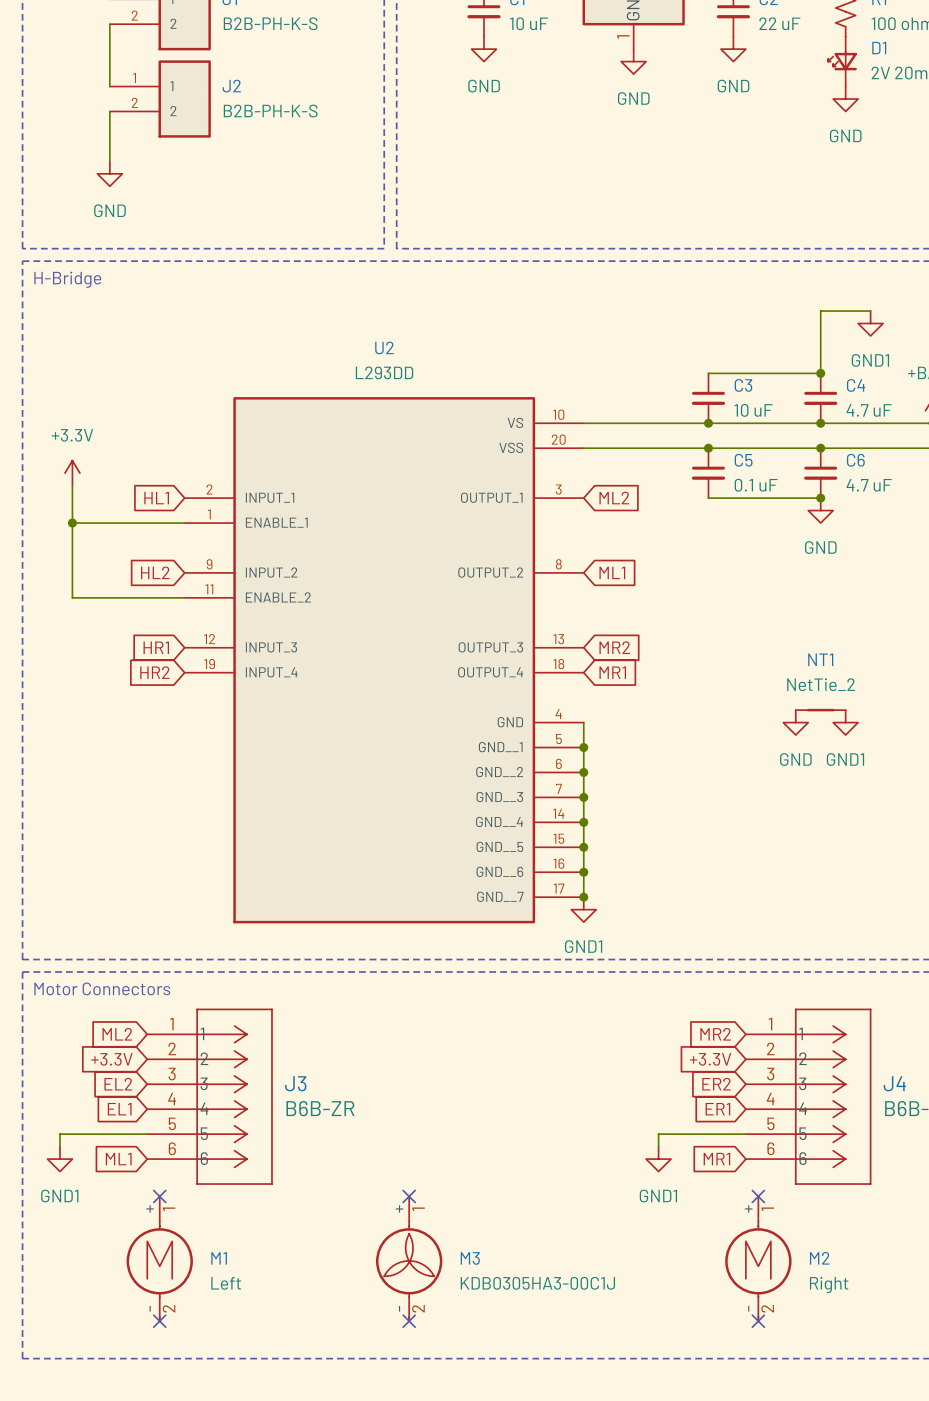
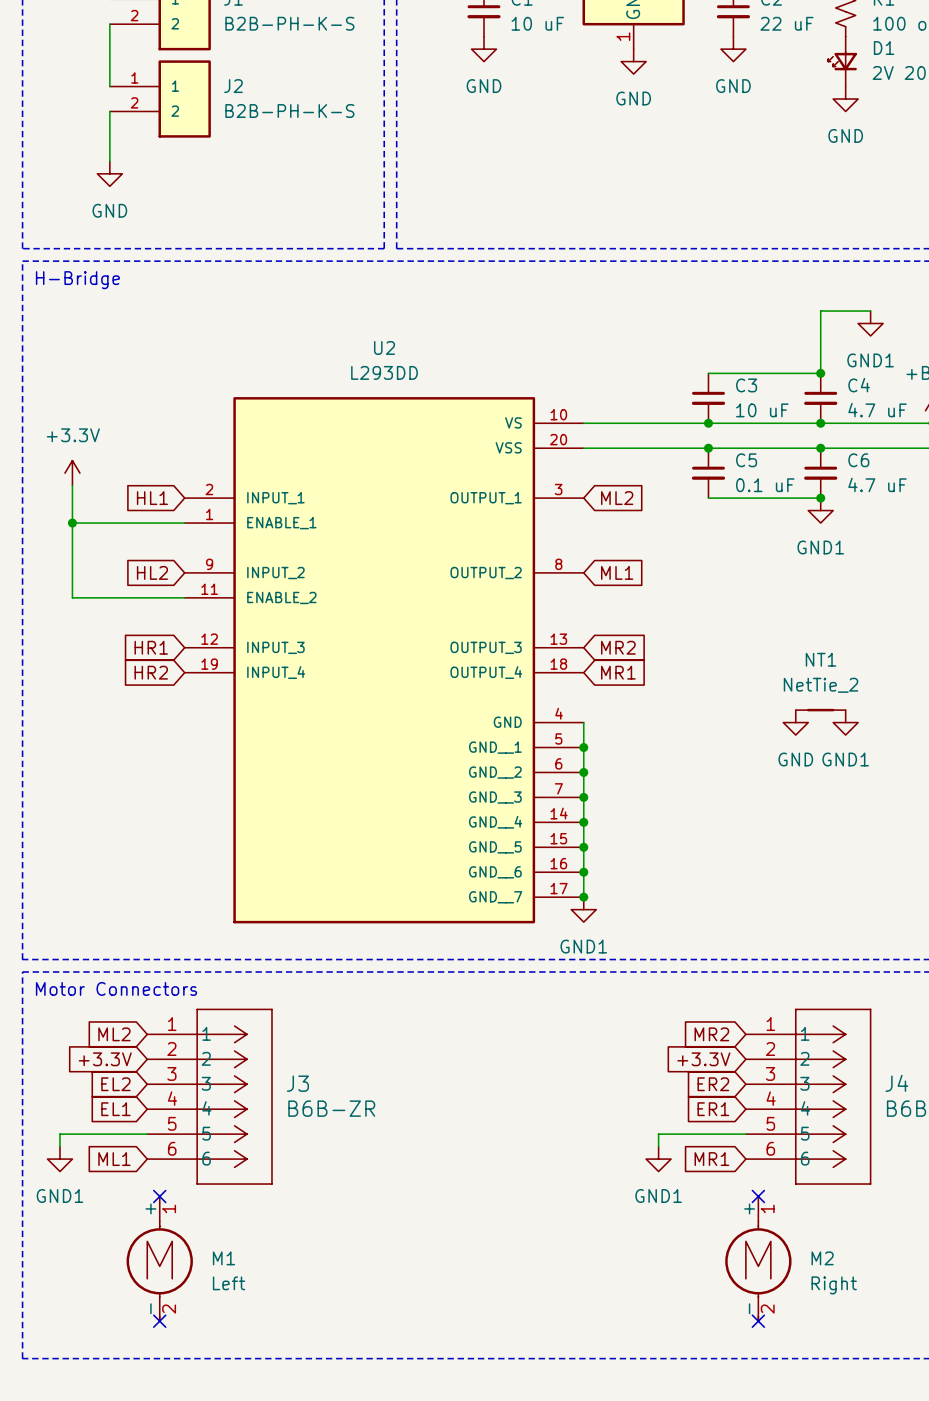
power symbol: GND (820, 510) -> GND1 (820, 510)
no-connect mark: (409, 1196) -> none
M3: KDB0305HA3-00C1J (409, 1258) -> none
no-connect mark: (409, 1321) -> none

